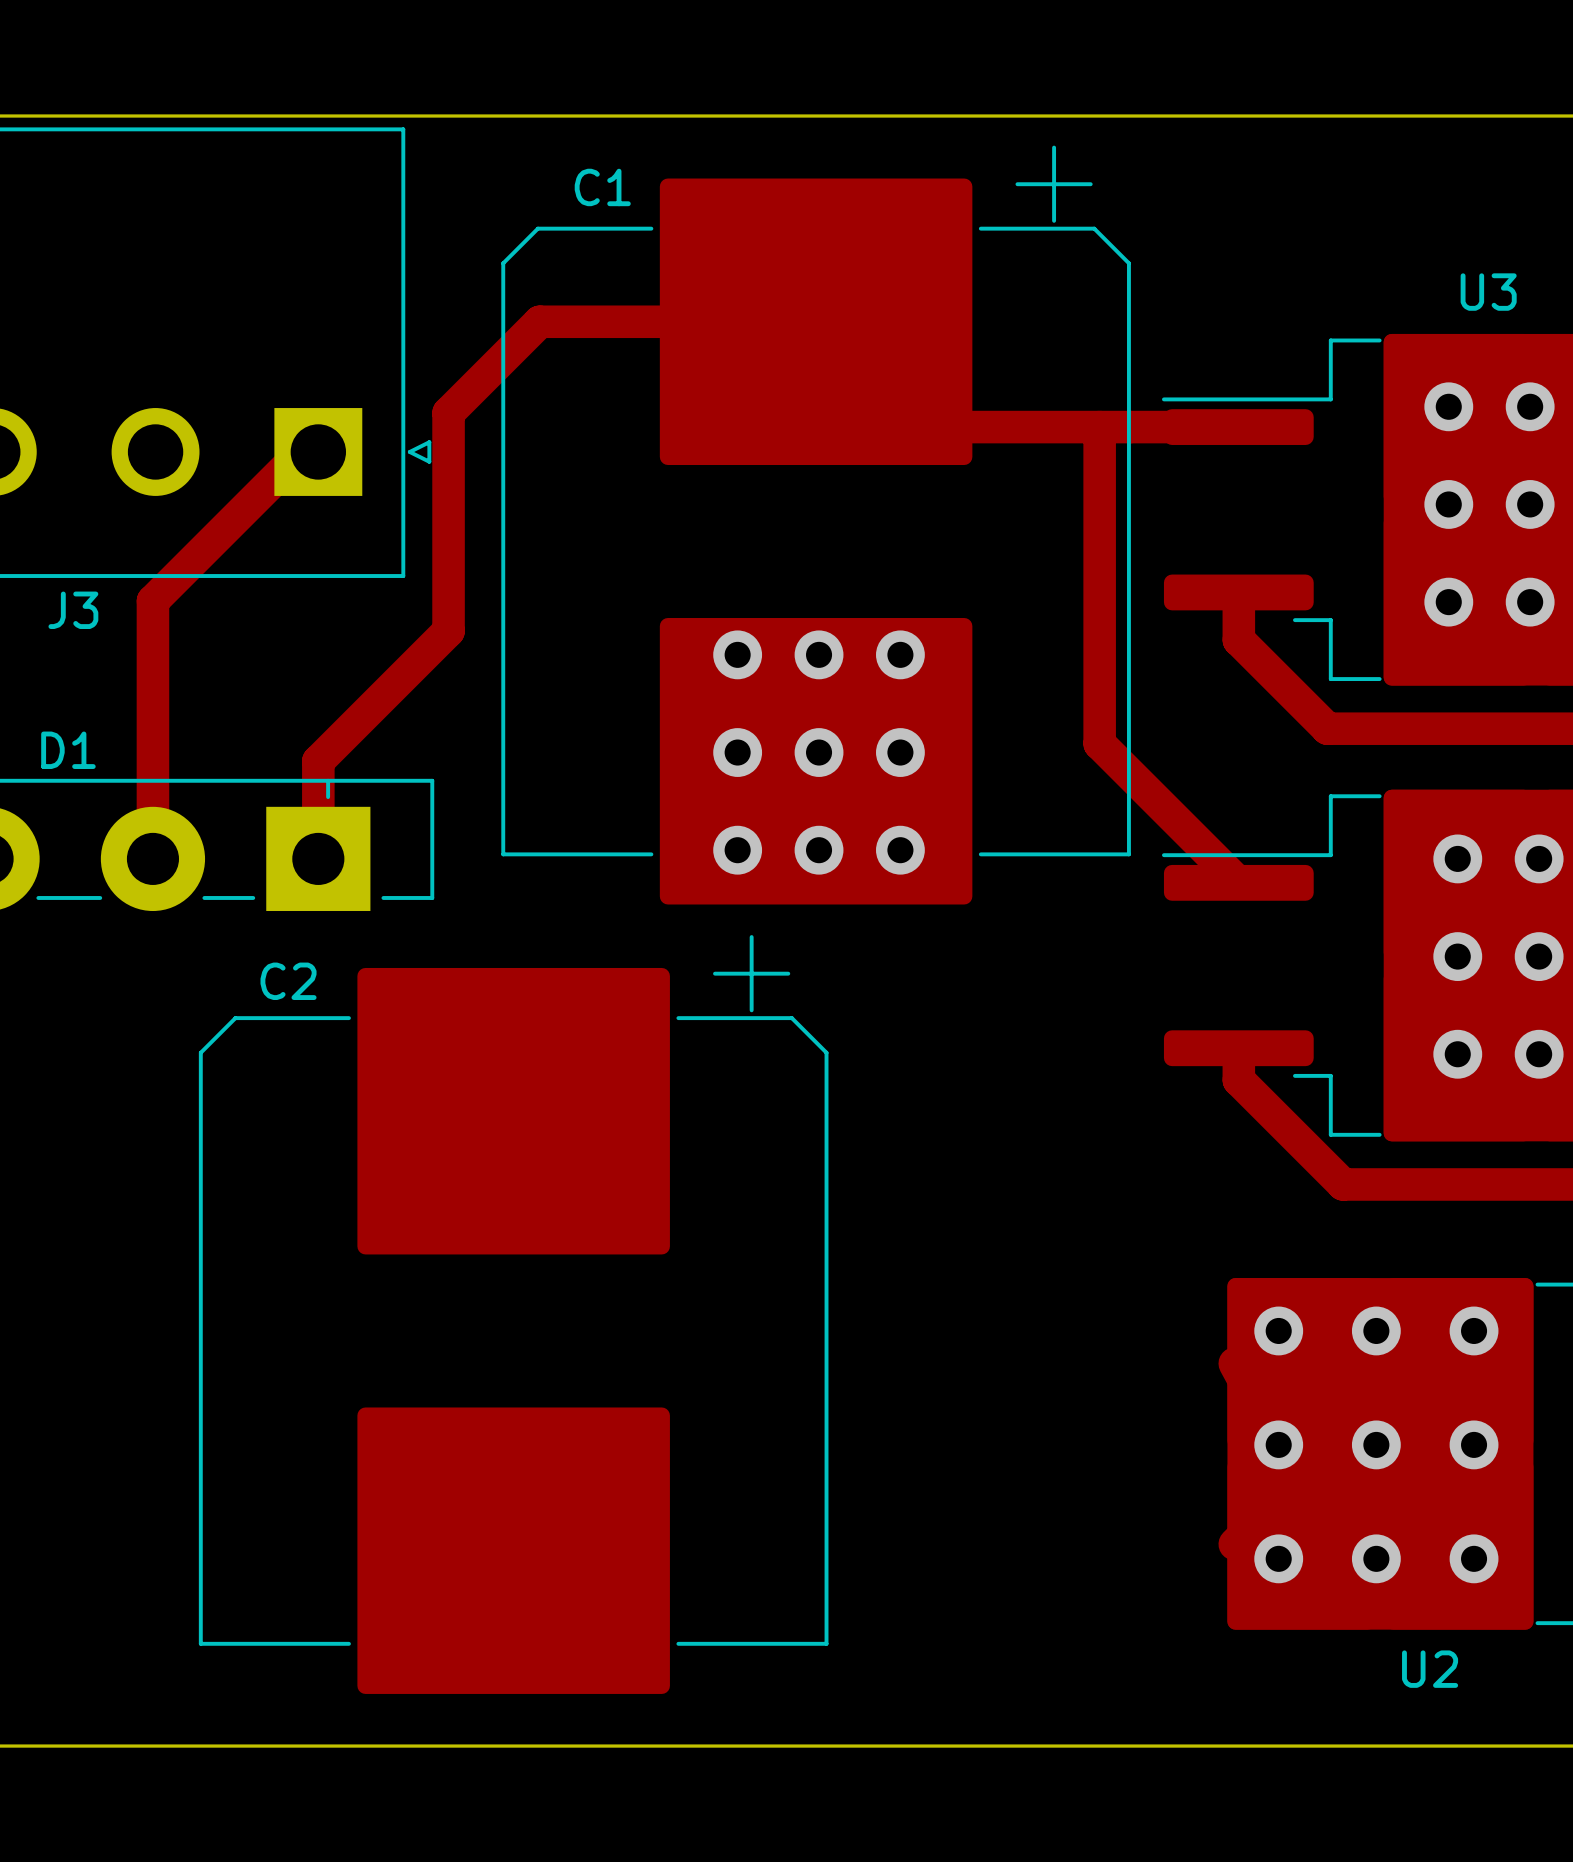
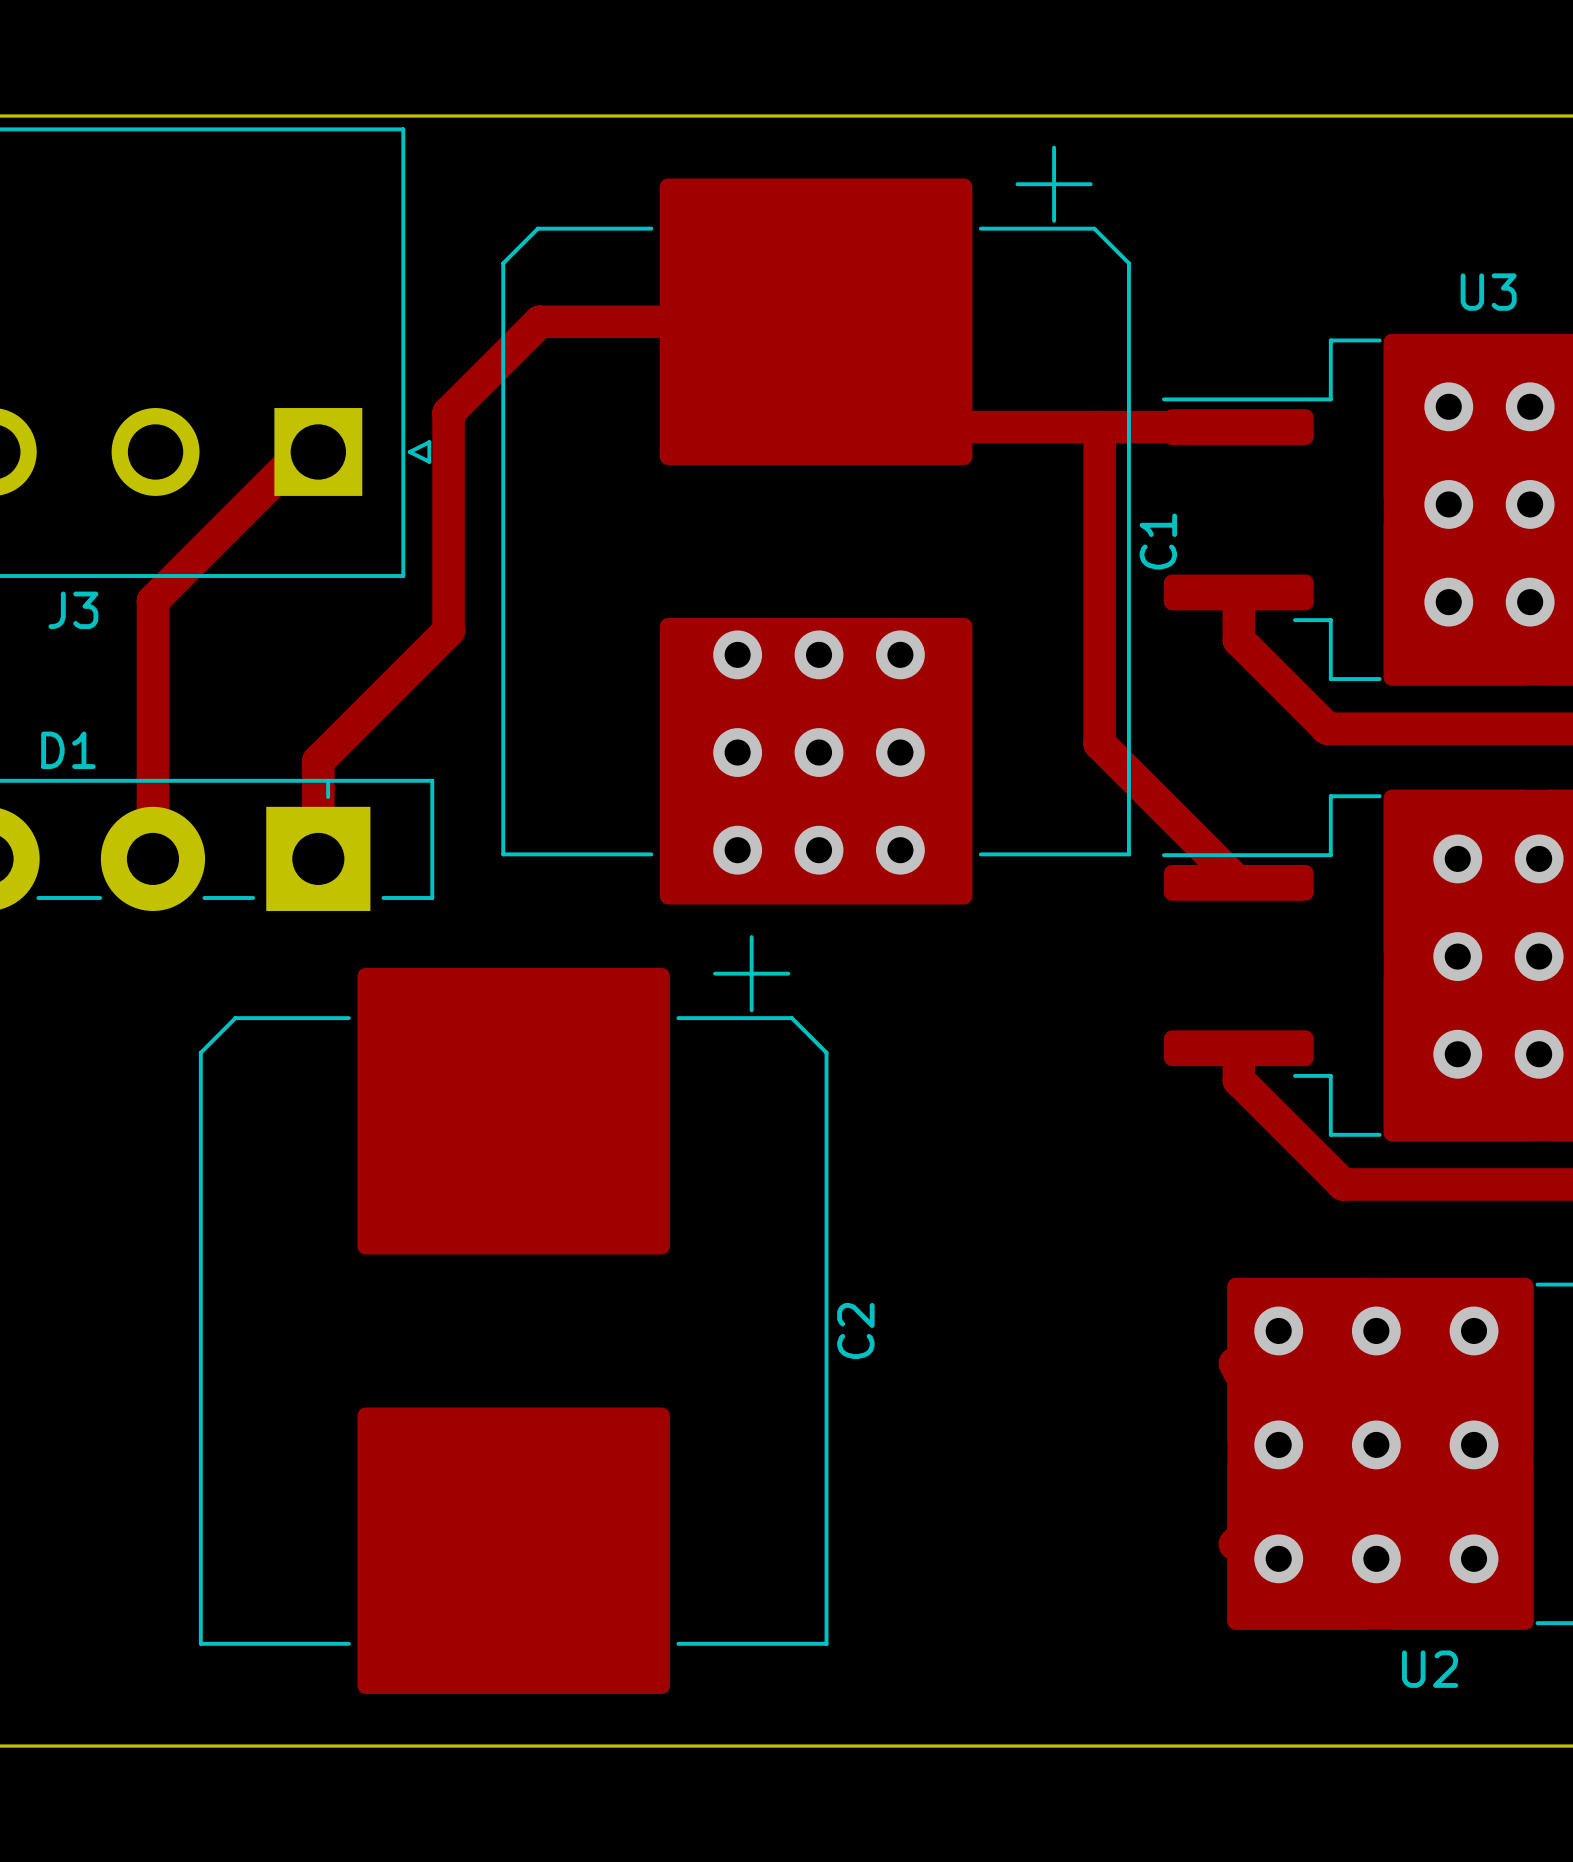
C1 name rotation: 0° (602, 187) -> 90° counterclockwise (1158, 541)
C1 name position: C1 (602, 187) -> C1 (1158, 541)
C2 name rotation: 0° (288, 981) -> 90° counterclockwise (855, 1330)
C2 name position: C2 (288, 981) -> C2 (855, 1330)

